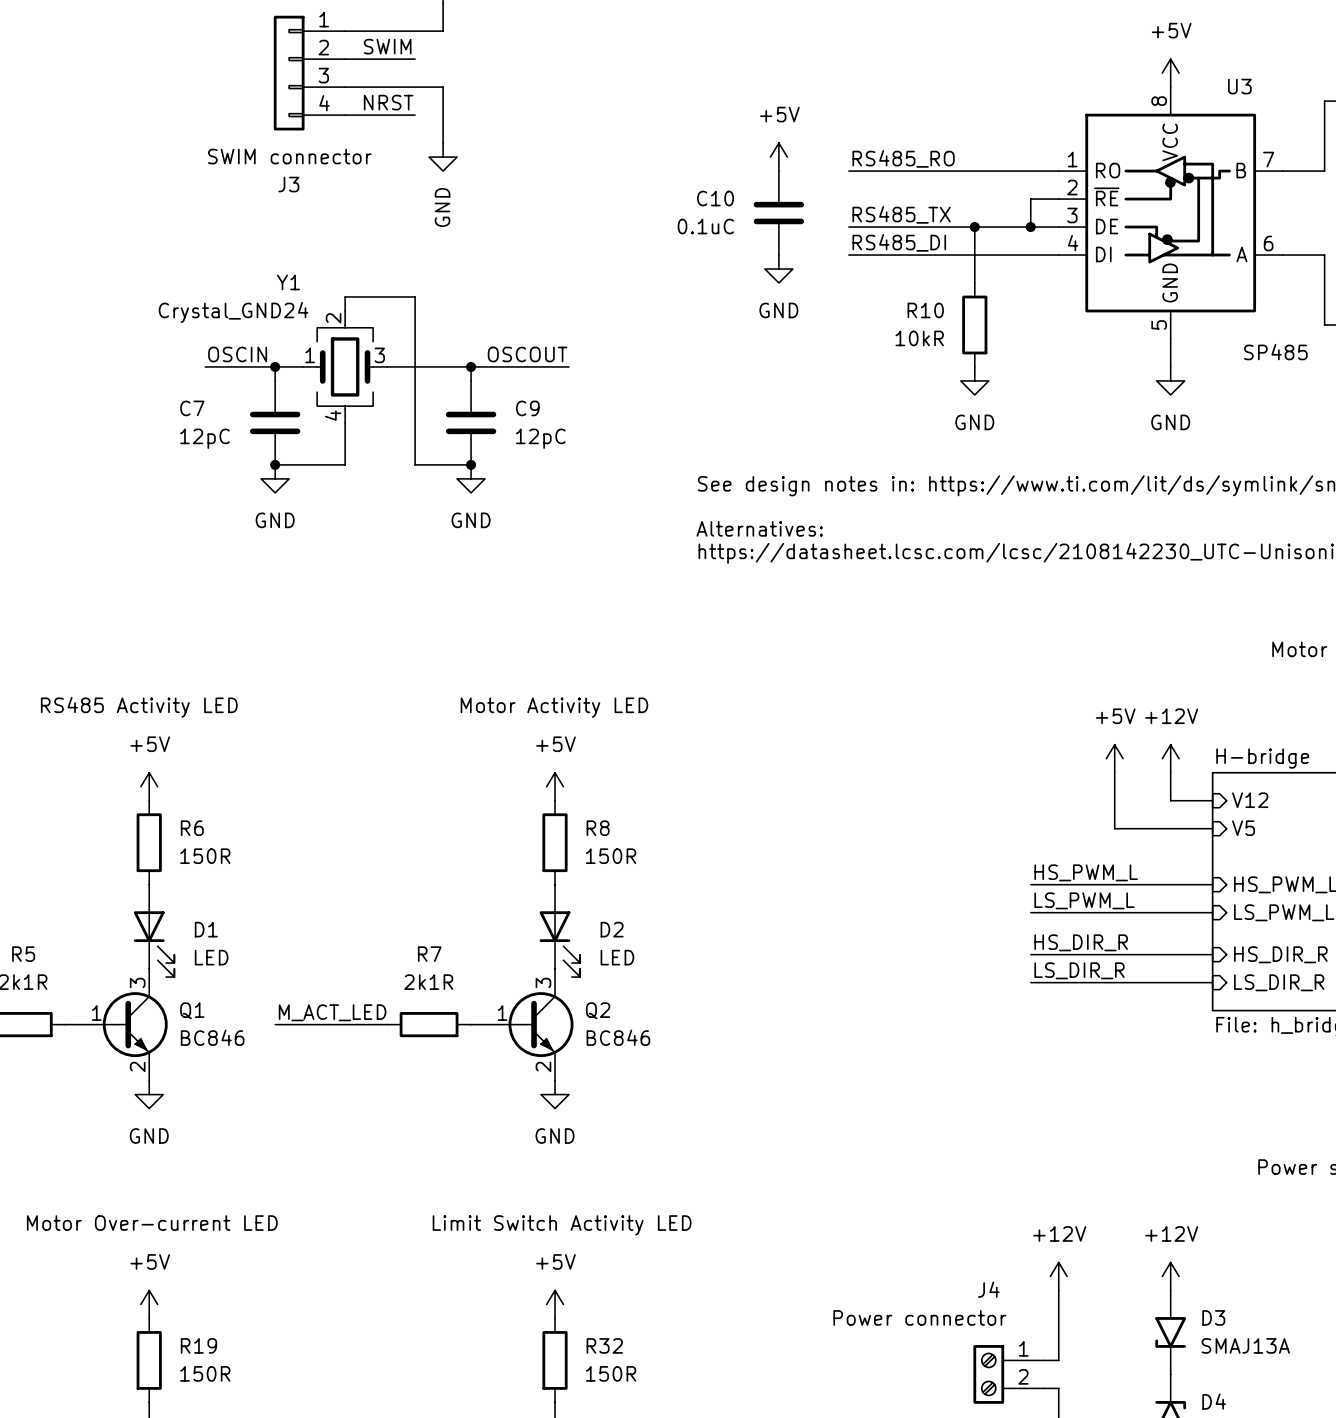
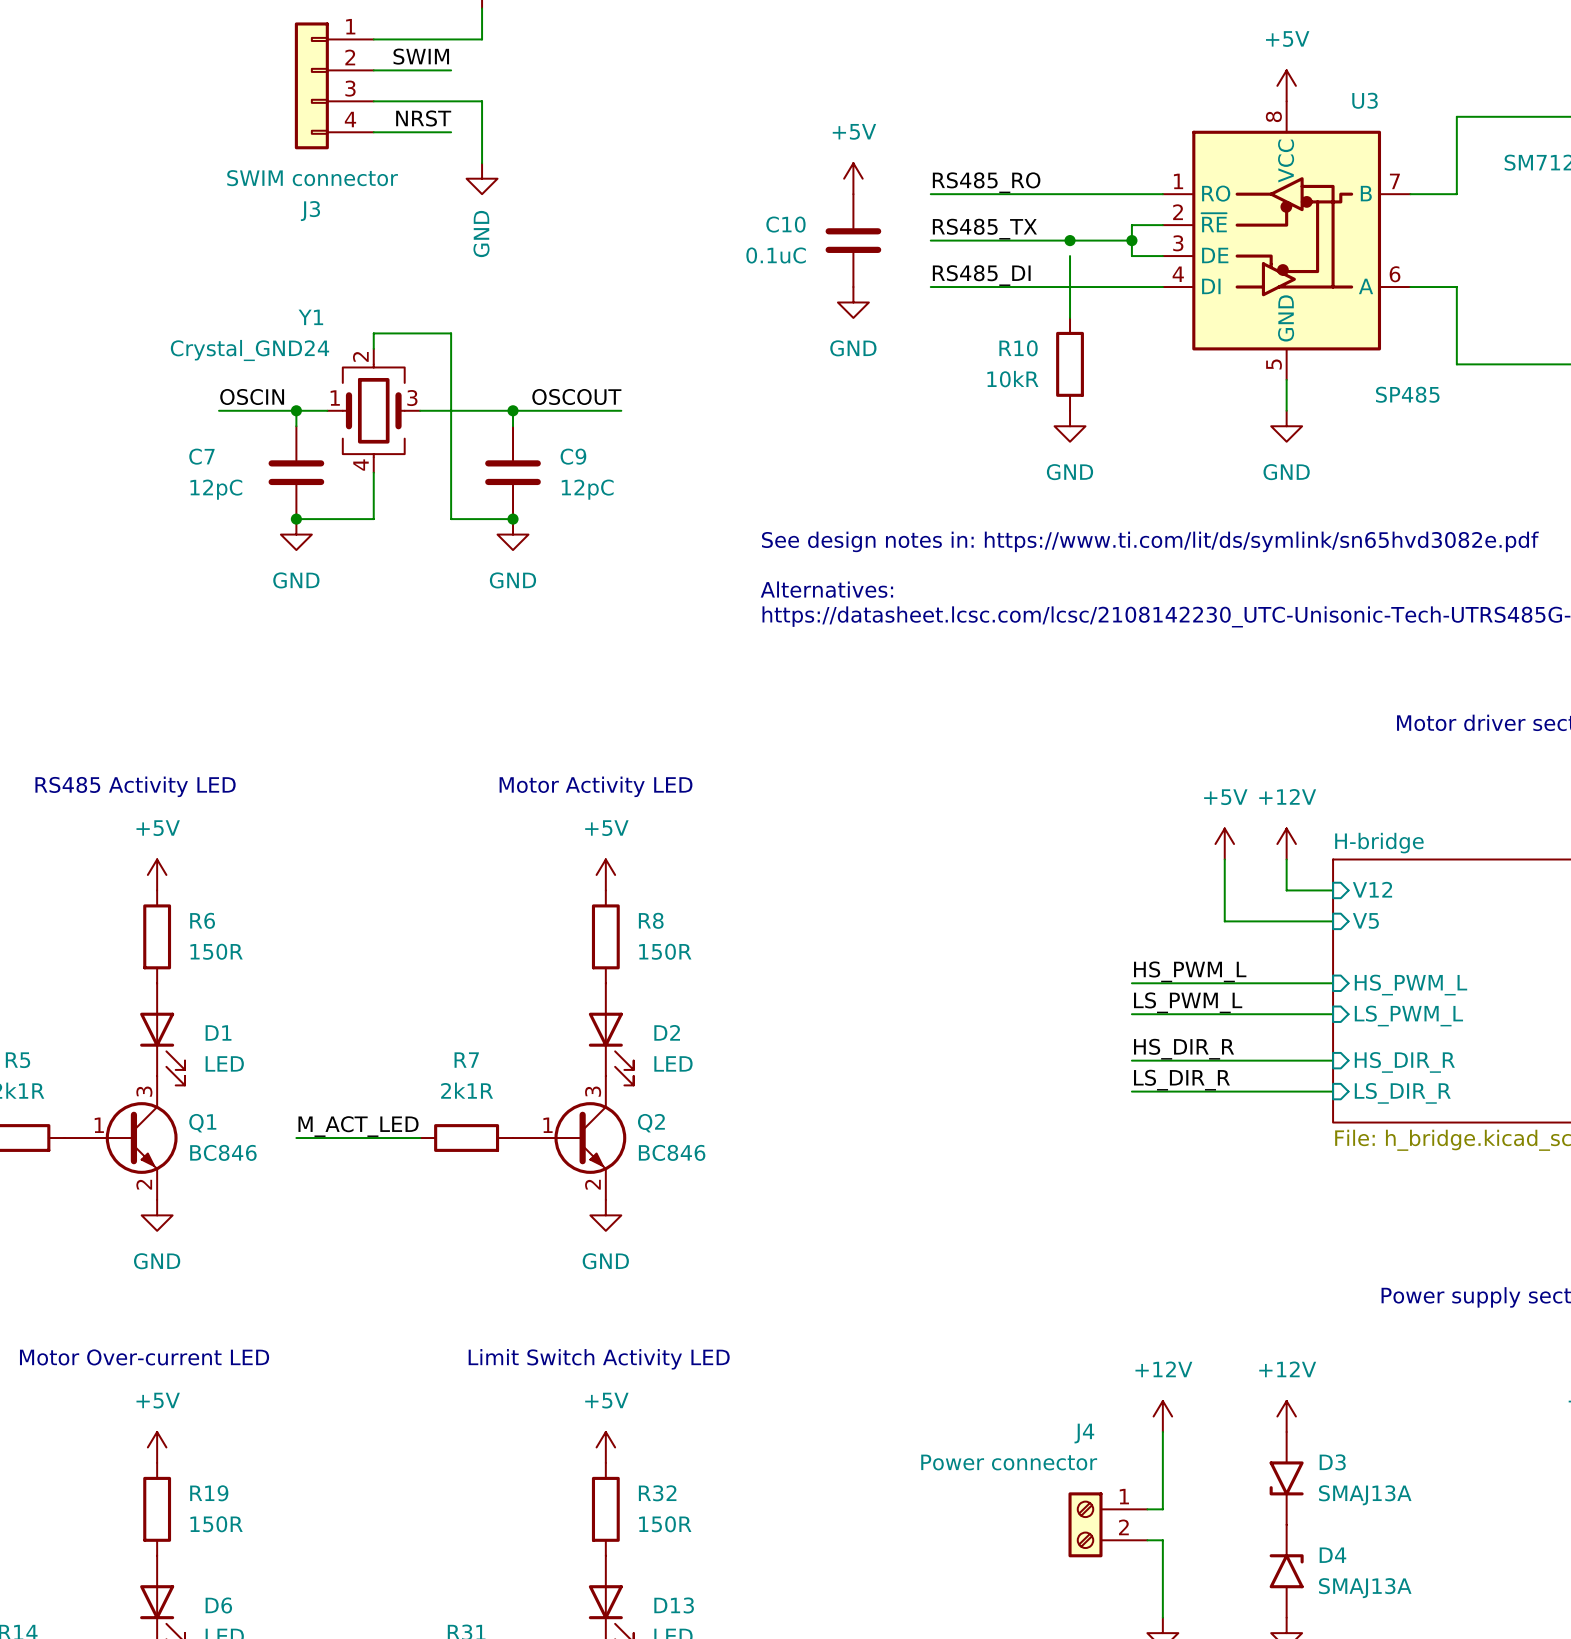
label position: RS485_TX (901, 214) -> RS485_TX (984, 229)
wire: (848, 227) (1030, 227) -> (930, 240) (1131, 240)
junction position: (974, 227) -> (1070, 240)
junction position: (1030, 227) -> (1131, 240)

